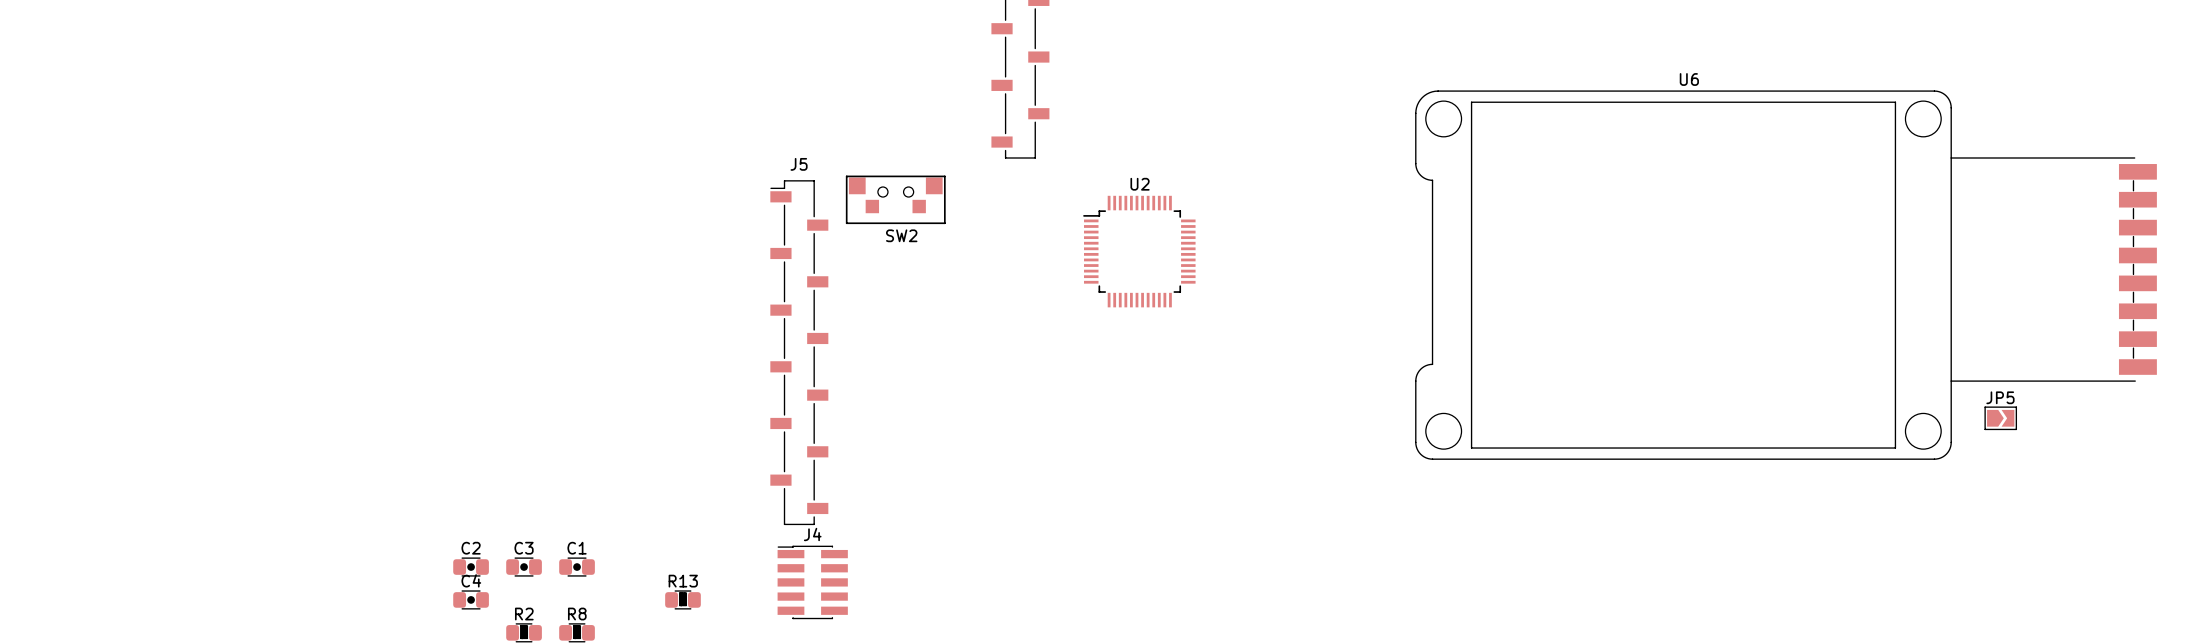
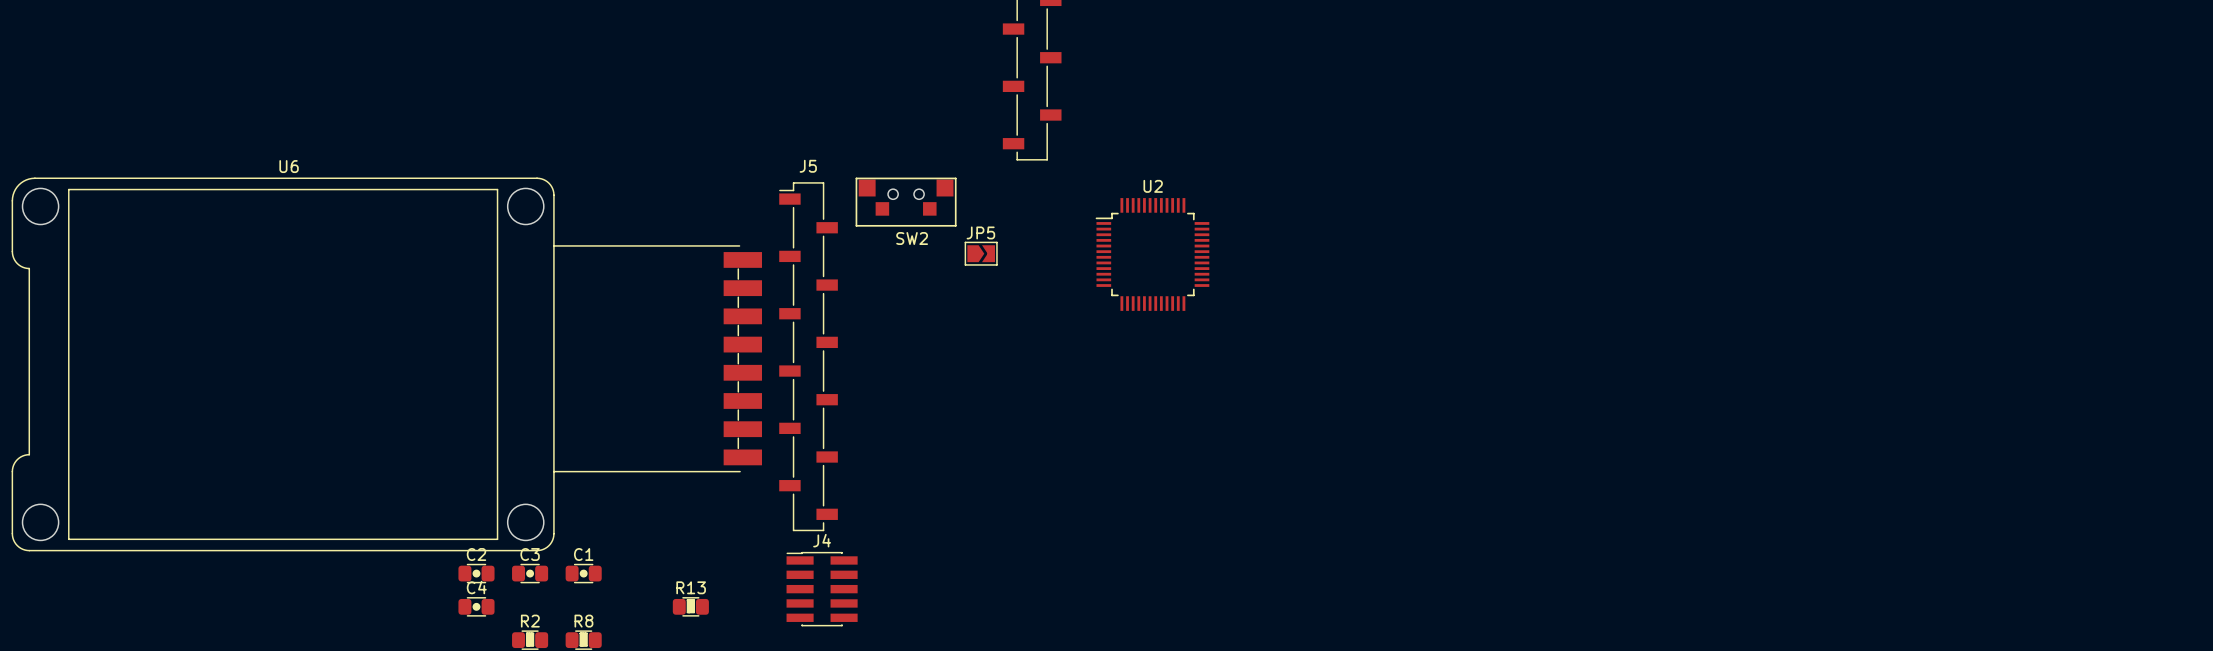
U6 position: (1786, 275) -> (386, 364)
JP5 position: (2000, 418) -> (981, 253)

